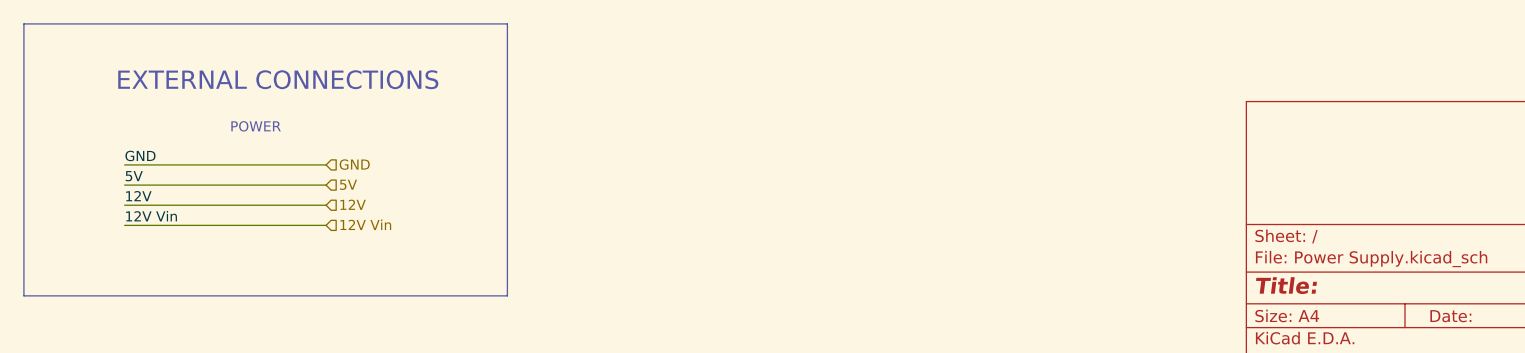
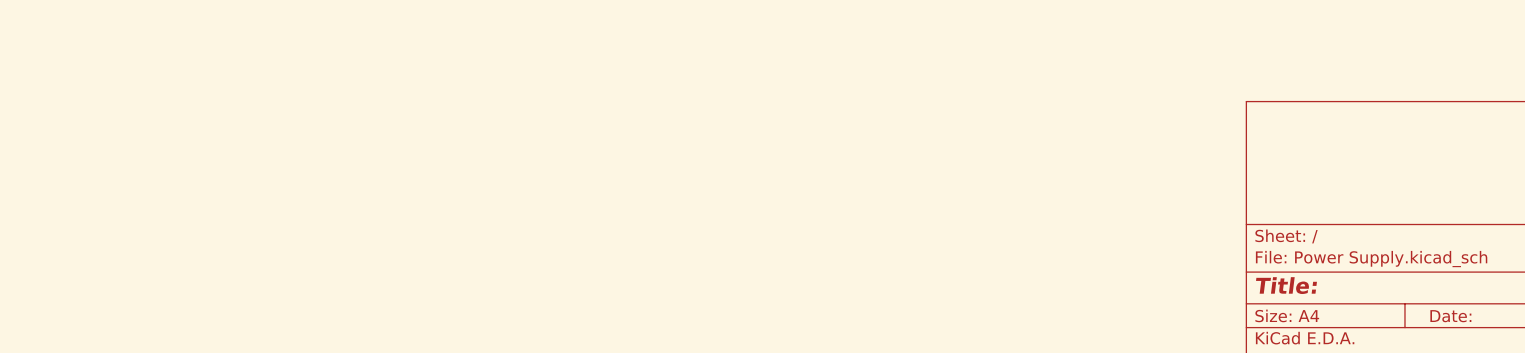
bus: (23, 23) (507, 23) (507, 295) (23, 295) (23, 23) -> none
text: EXTERNAL CONNECTIONS (278, 79) -> none
text: POWER (256, 126) -> none
label: GND (140, 155) -> none
wire: (124, 164) (326, 164) -> none
hierarchical label: GND (354, 164) -> none
label: 5V (134, 176) -> none
hierarchical label: 5V (348, 184) -> none
wire: (124, 185) (326, 185) -> none
label: 12V (138, 196) -> none
hierarchical label: 12V (353, 204) -> none
wire: (124, 205) (326, 205) -> none
label: 12V Vin (151, 216) -> none
hierarchical label: 12V Vin (365, 224) -> none
wire: (124, 225) (326, 225) -> none

